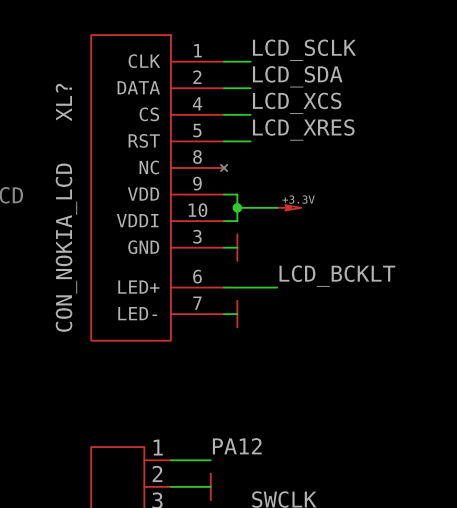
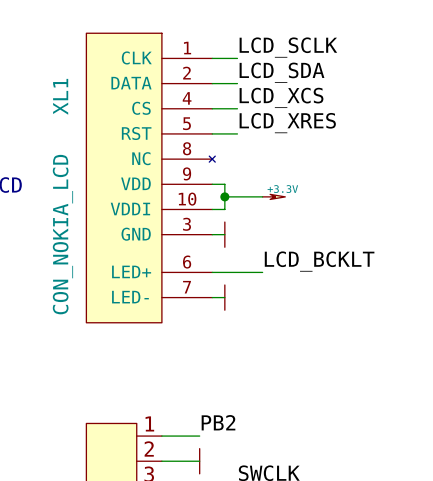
XL? name: XL? (63, 102) -> XL1 (60, 96)
label: PA12 (237, 446) -> PB2 (218, 422)

